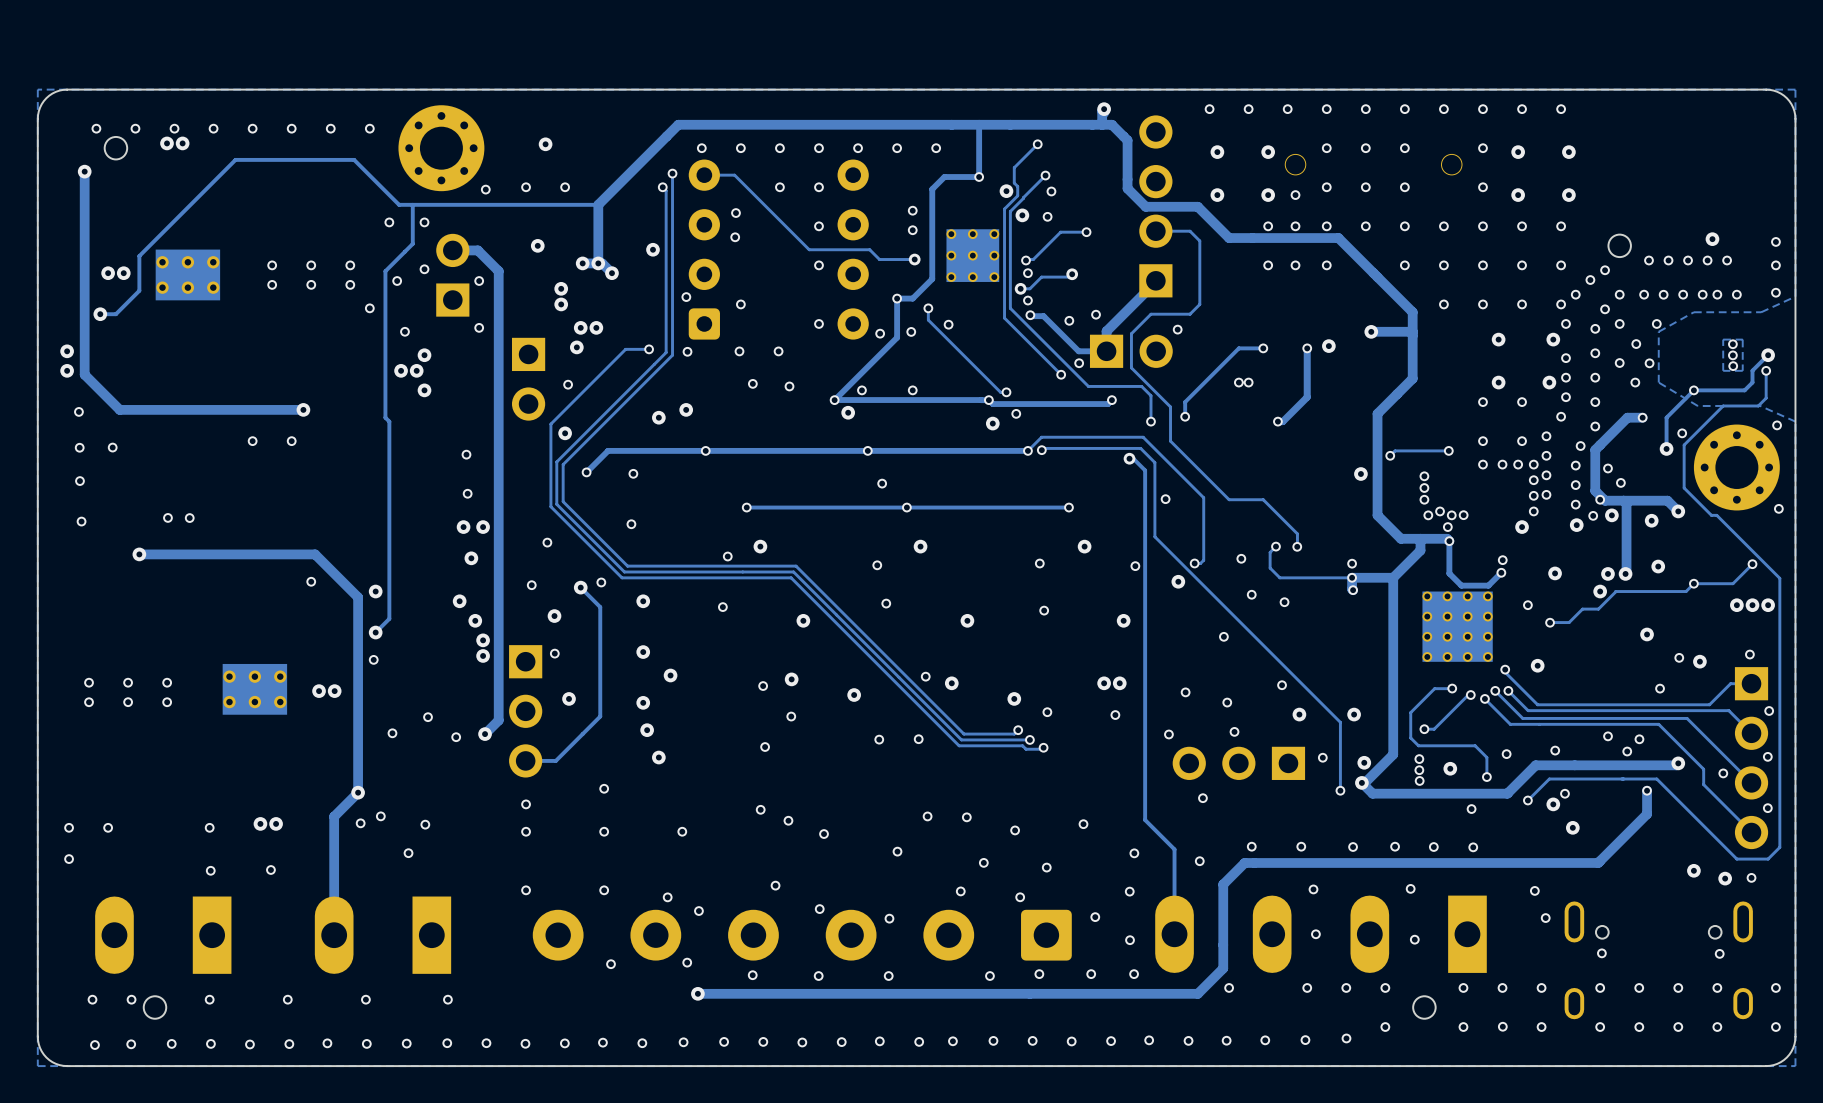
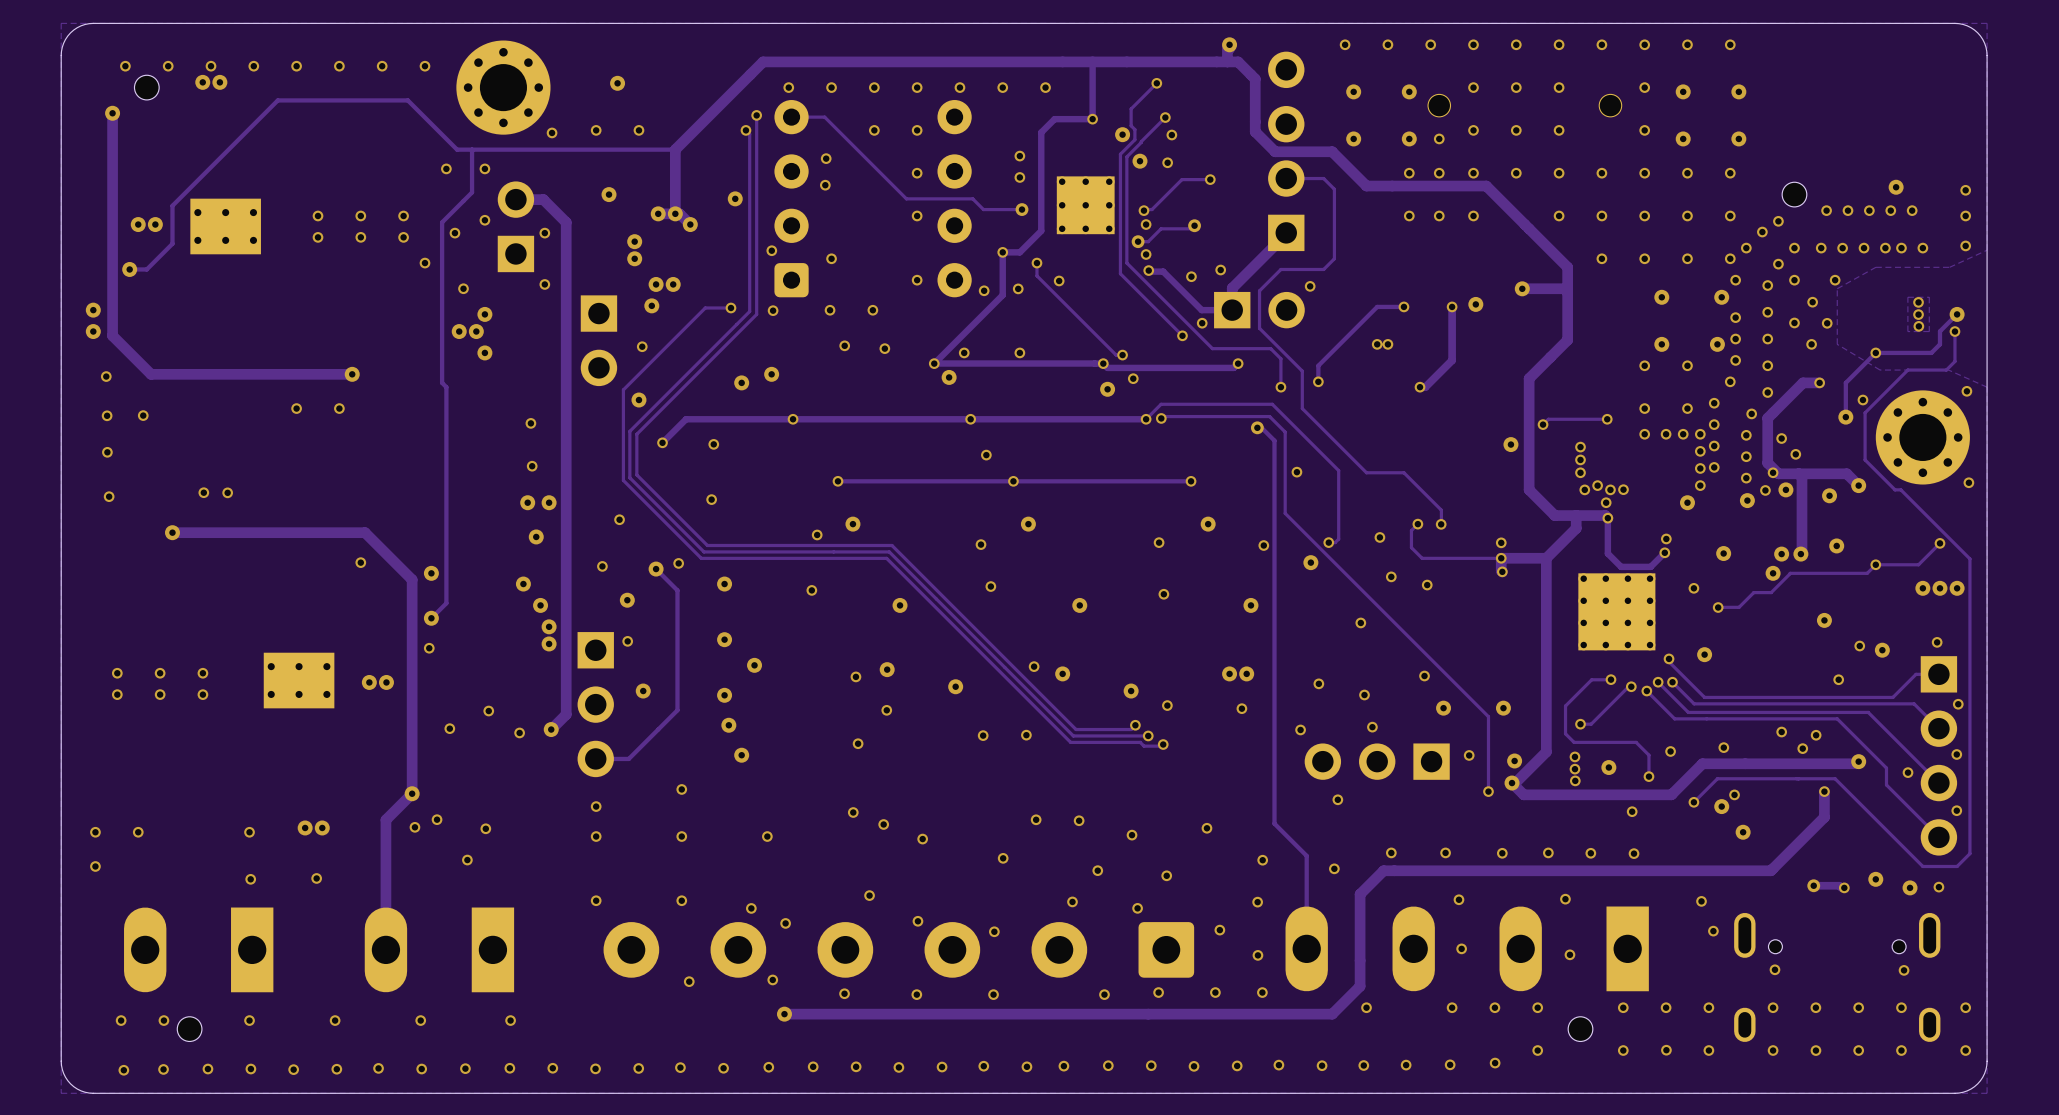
track: none -> (1813, 885) (1839, 885) (1844, 887)
via: none -> (1813, 885)
via: none -> (1844, 887)

